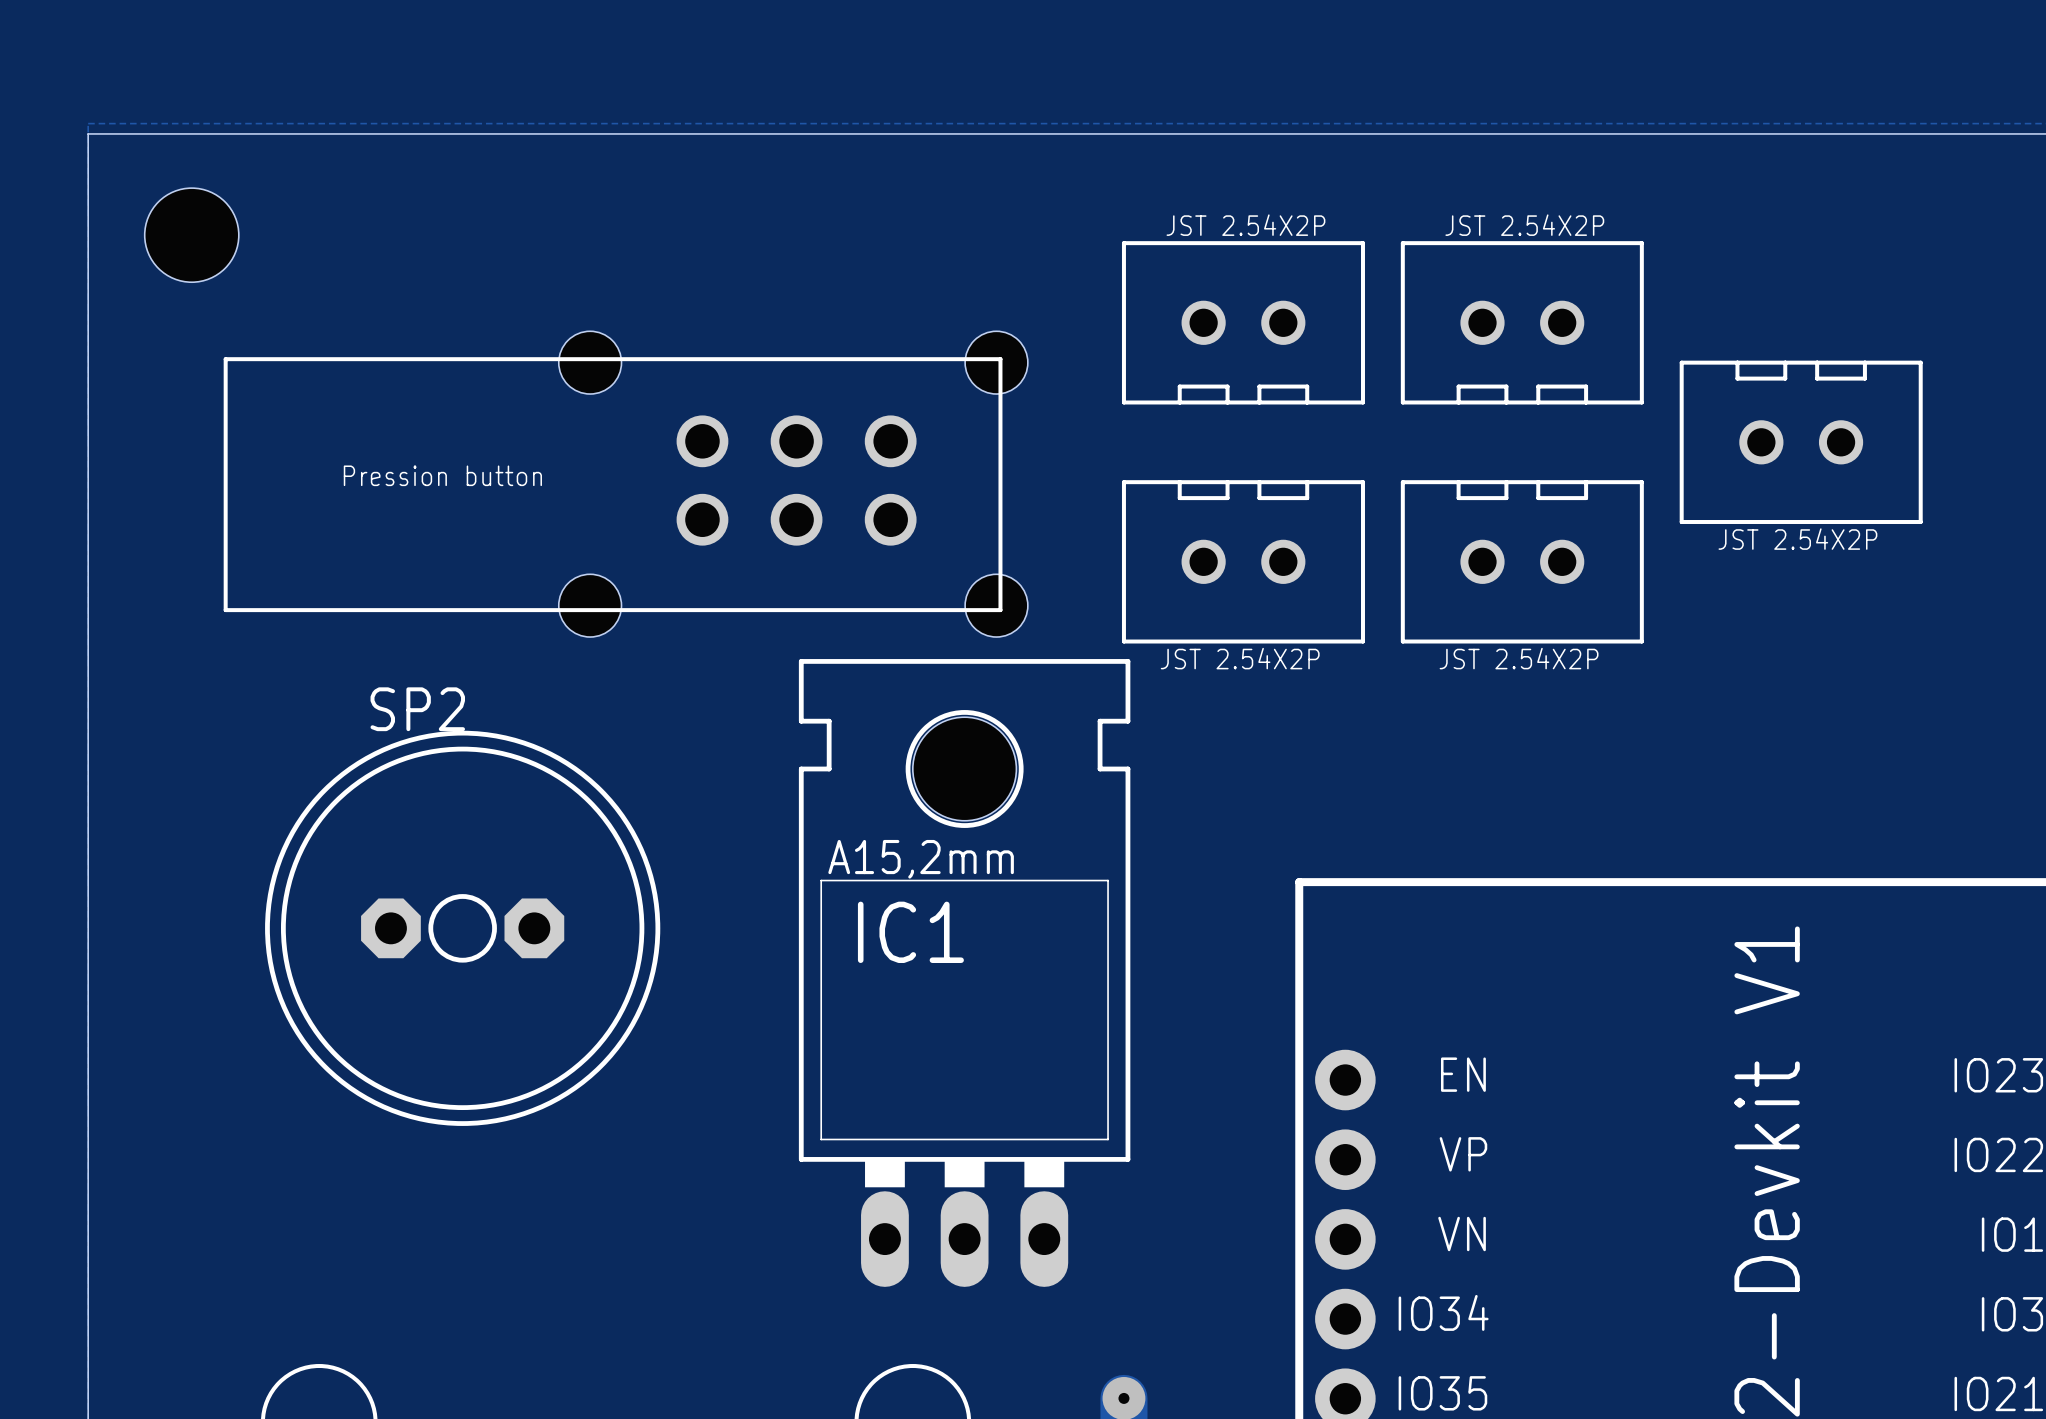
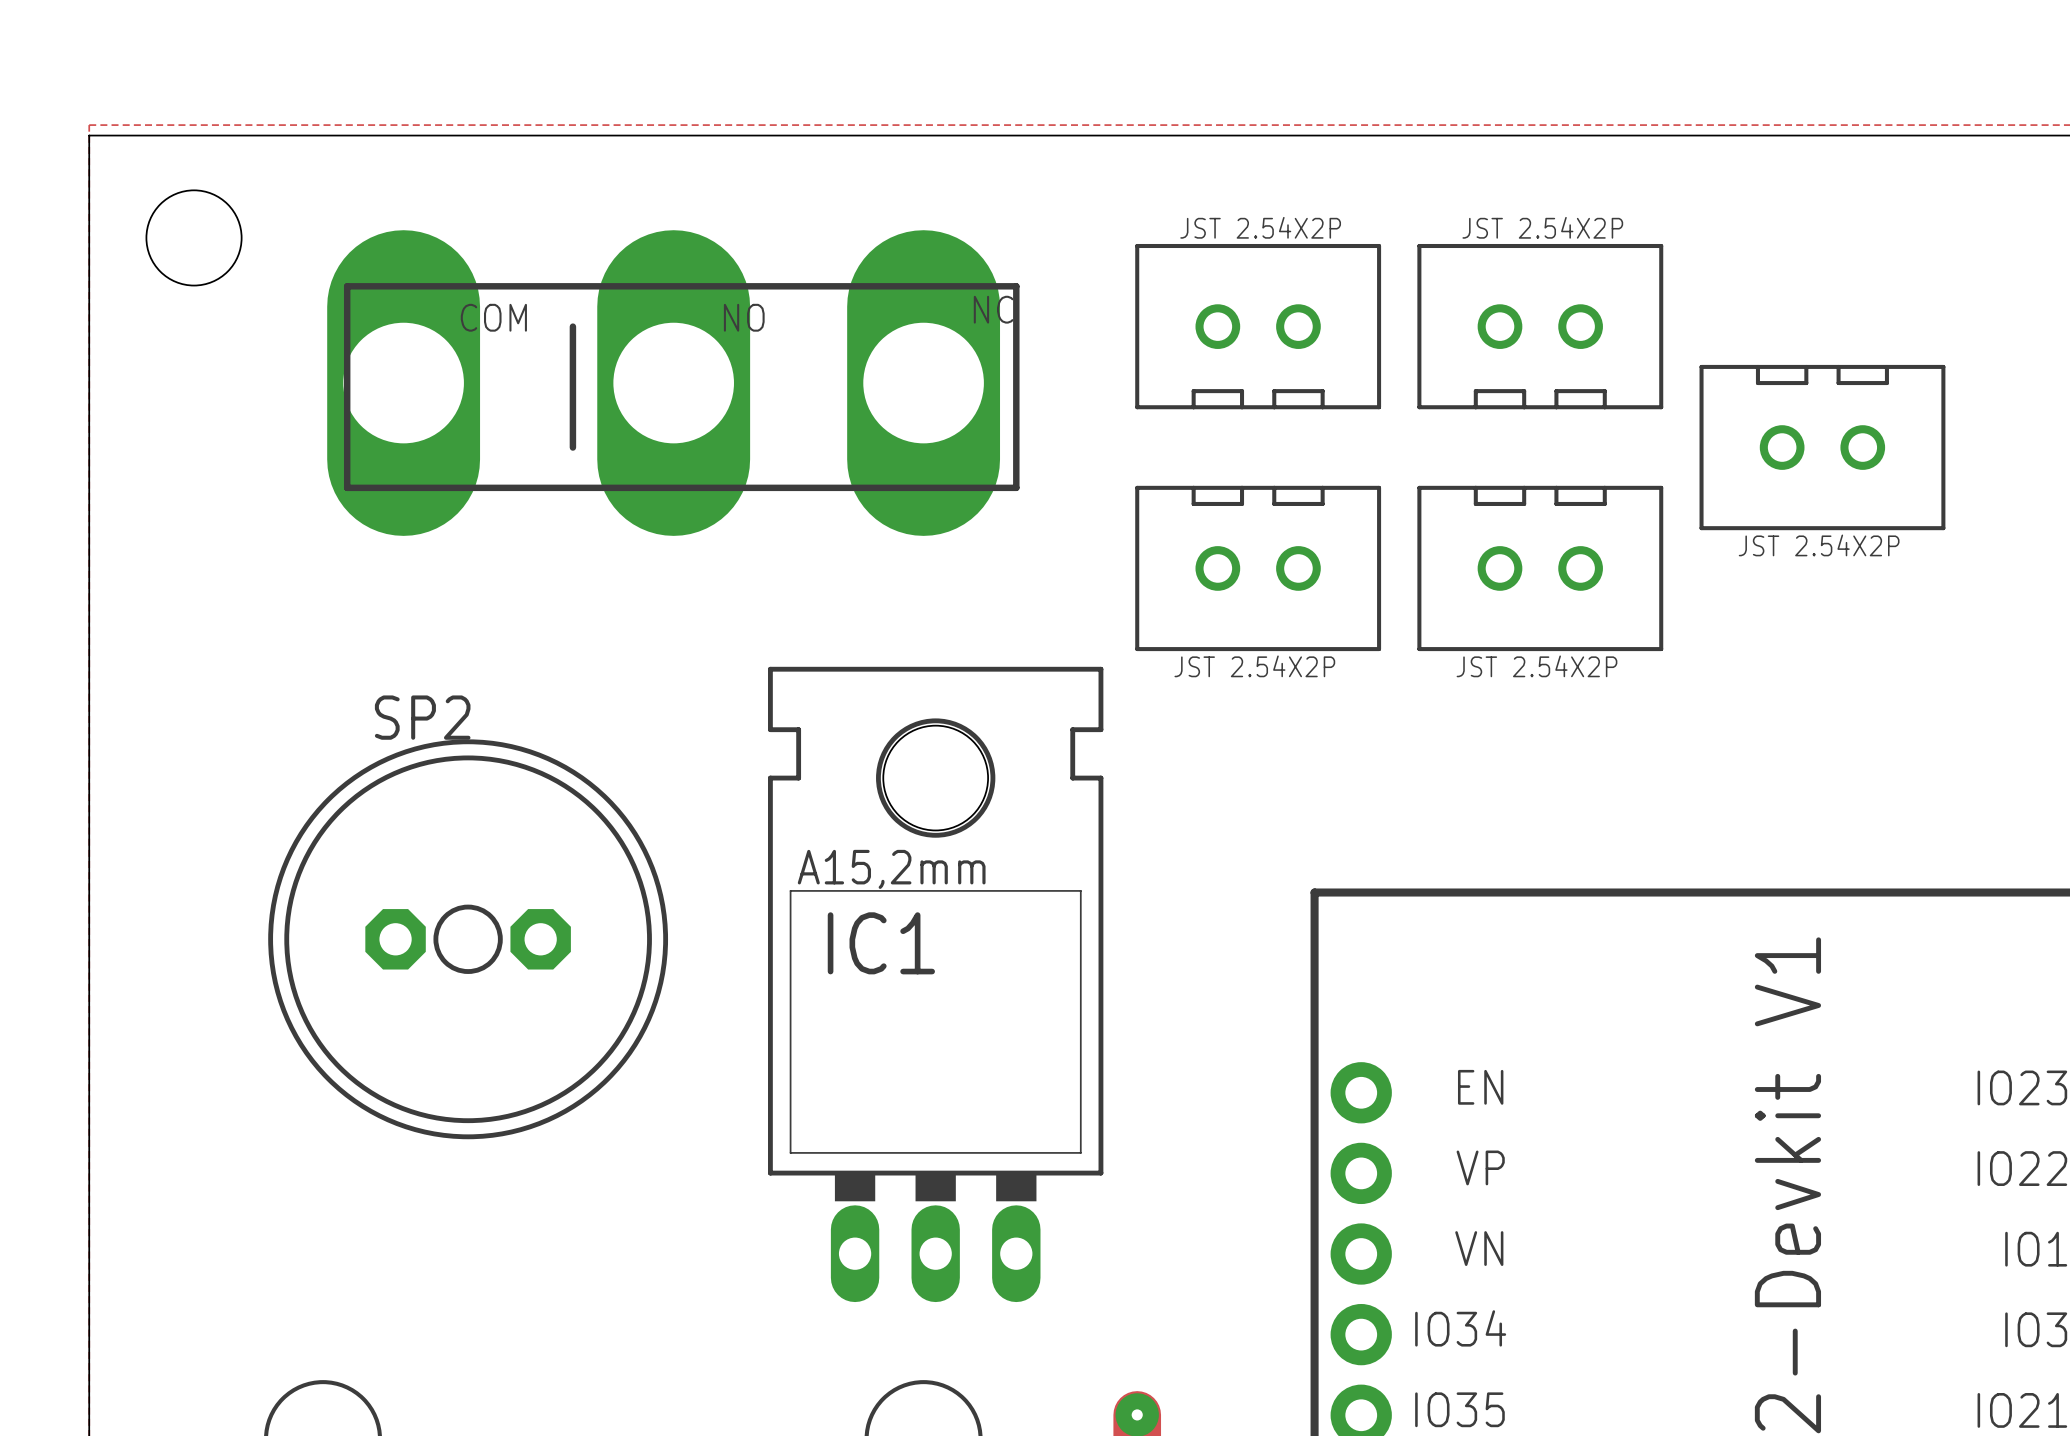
part: none -> (673, 383)
part: (625, 484) -> none
IC1 position: (964, 972) -> (935, 984)

